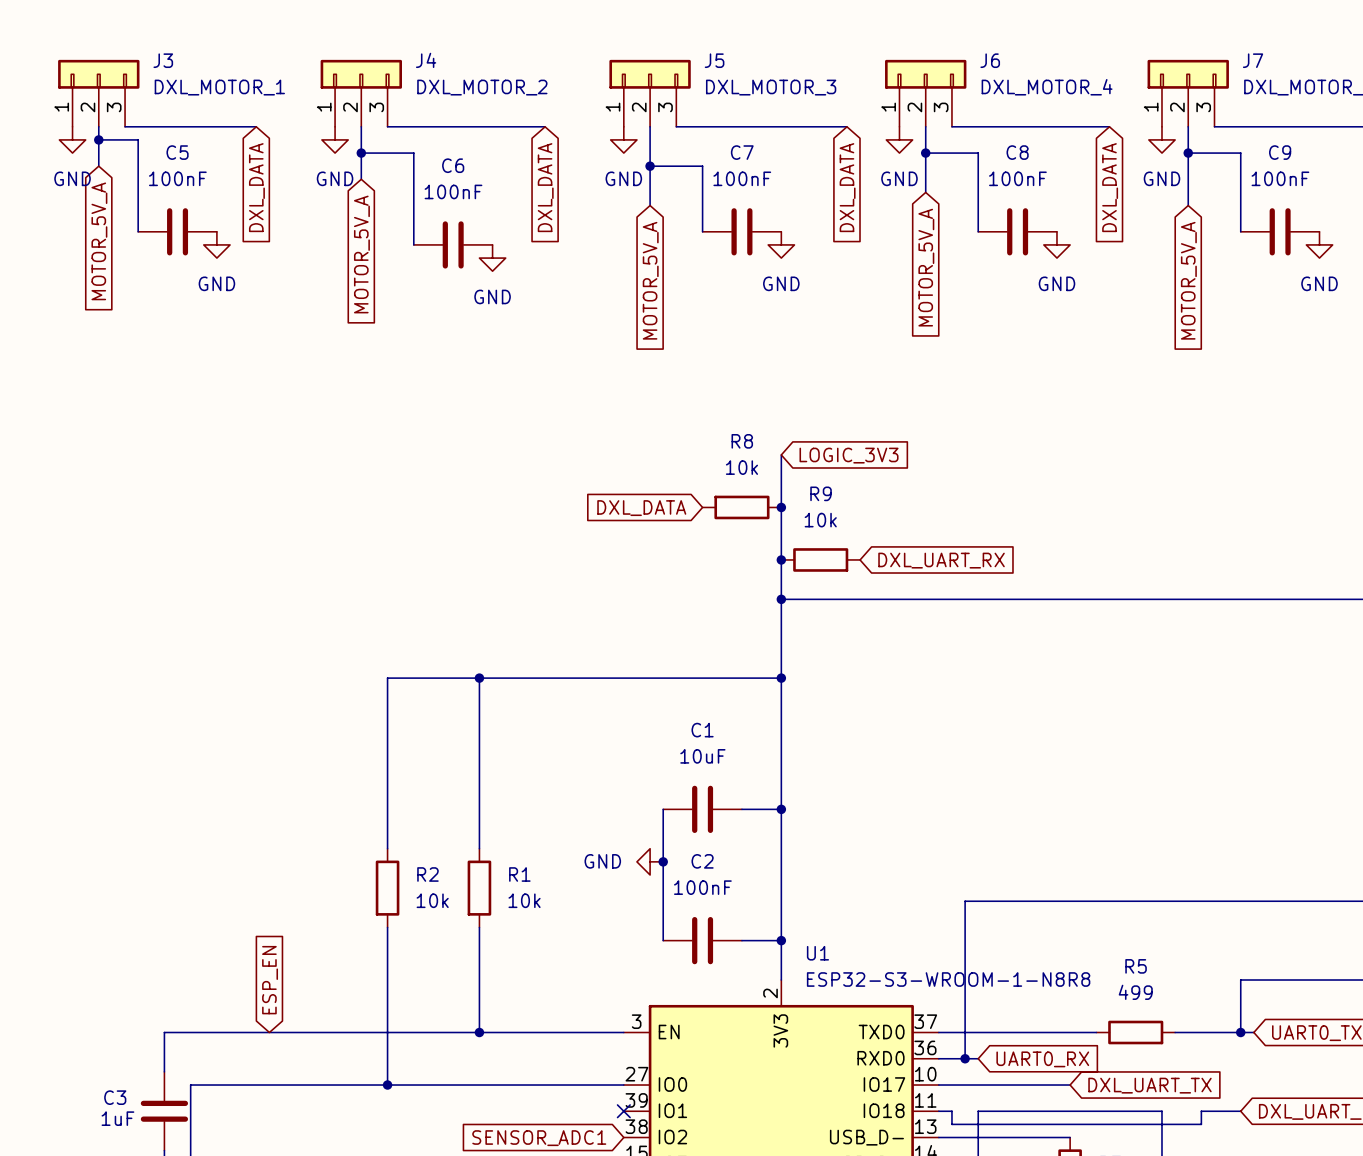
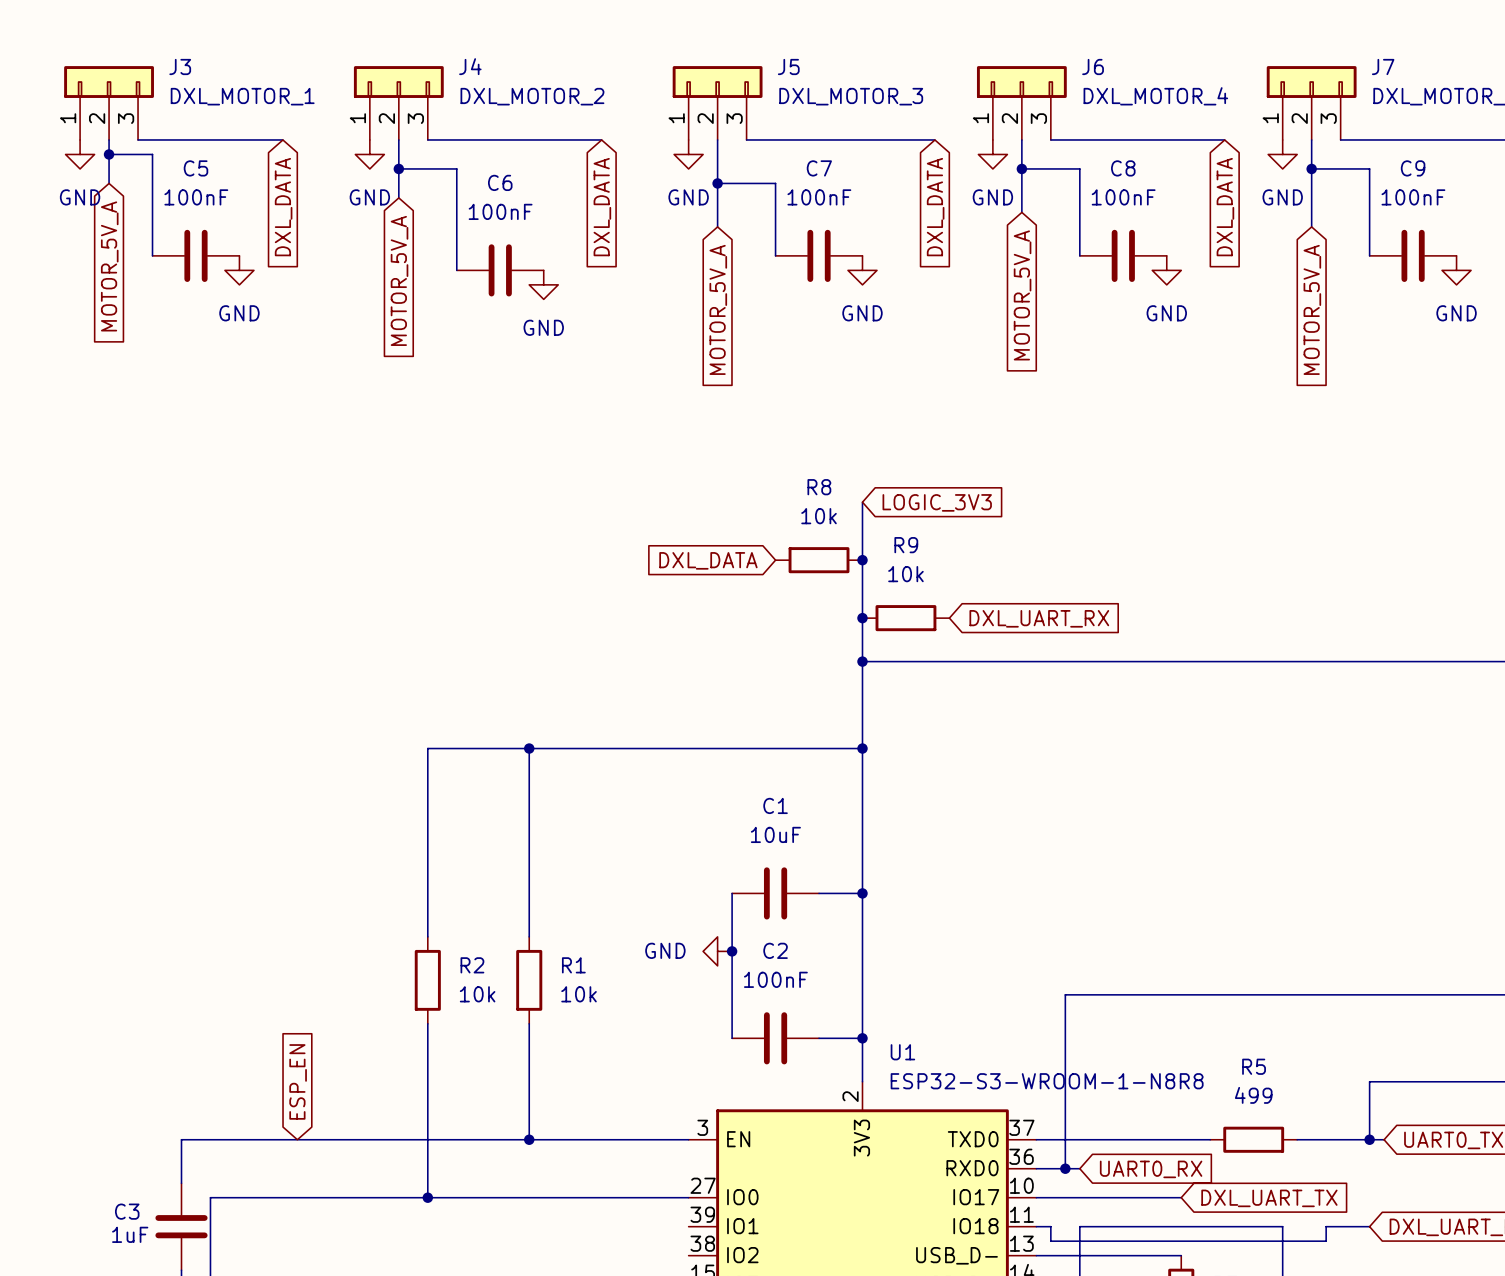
no-connect mark: (623, 1111) -> none
global label: SENSOR_ADC1 (539, 1138) -> none

